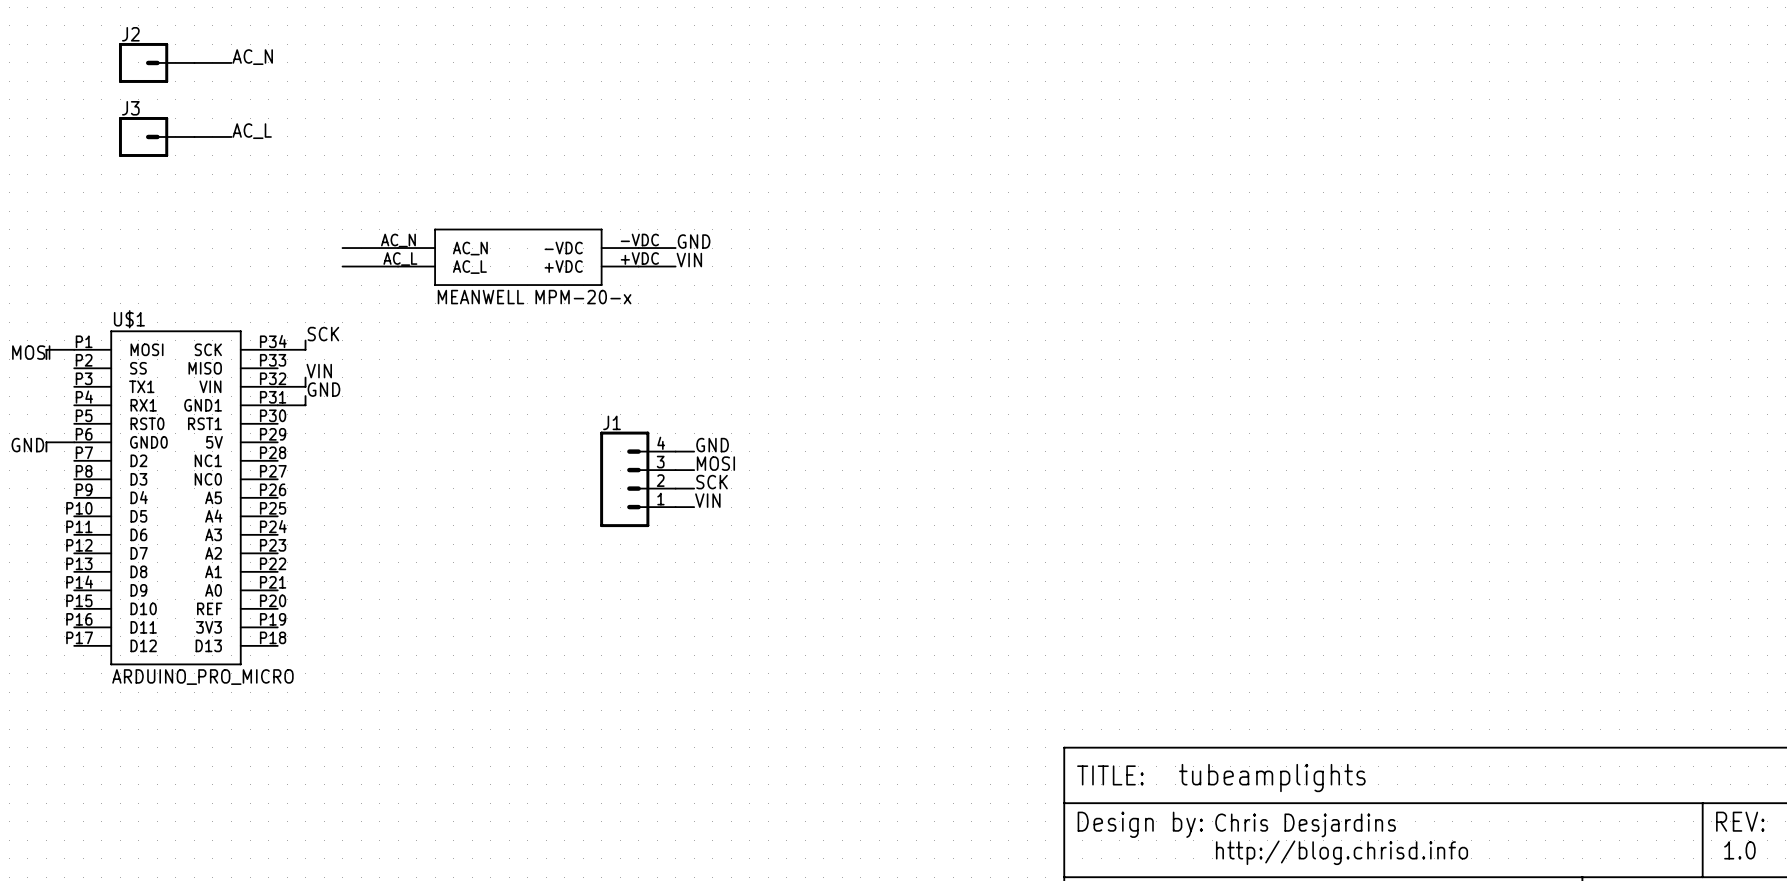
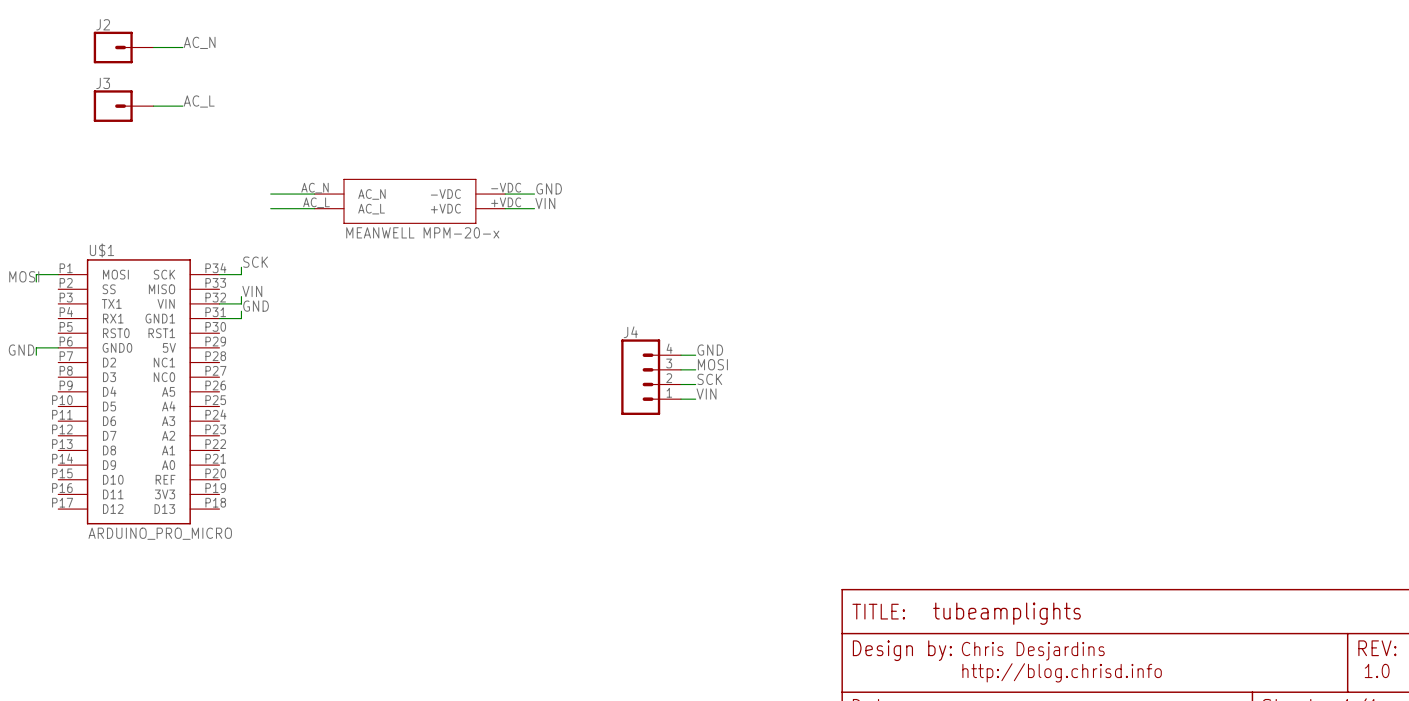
label: GND (712, 445) -> none
label: none -> GND (710, 350)
wire: (675, 451) (694, 451) -> none
wire: none -> (681, 355) (695, 355)
label: MOSI (715, 463) -> none
label: none -> MOSI (712, 364)
wire: (675, 470) (694, 470) -> none
wire: none -> (681, 369) (695, 369)
J1: (637, 479) -> none
J4: none -> (651, 377)
label: SCK (712, 482) -> none
label: none -> SCK (709, 379)
wire: (675, 488) (694, 488) -> none
wire: none -> (681, 384) (695, 384)
label: VIN (707, 500) -> none
label: none -> VIN (706, 394)
wire: (675, 507) (694, 507) -> none
wire: none -> (681, 399) (695, 399)

